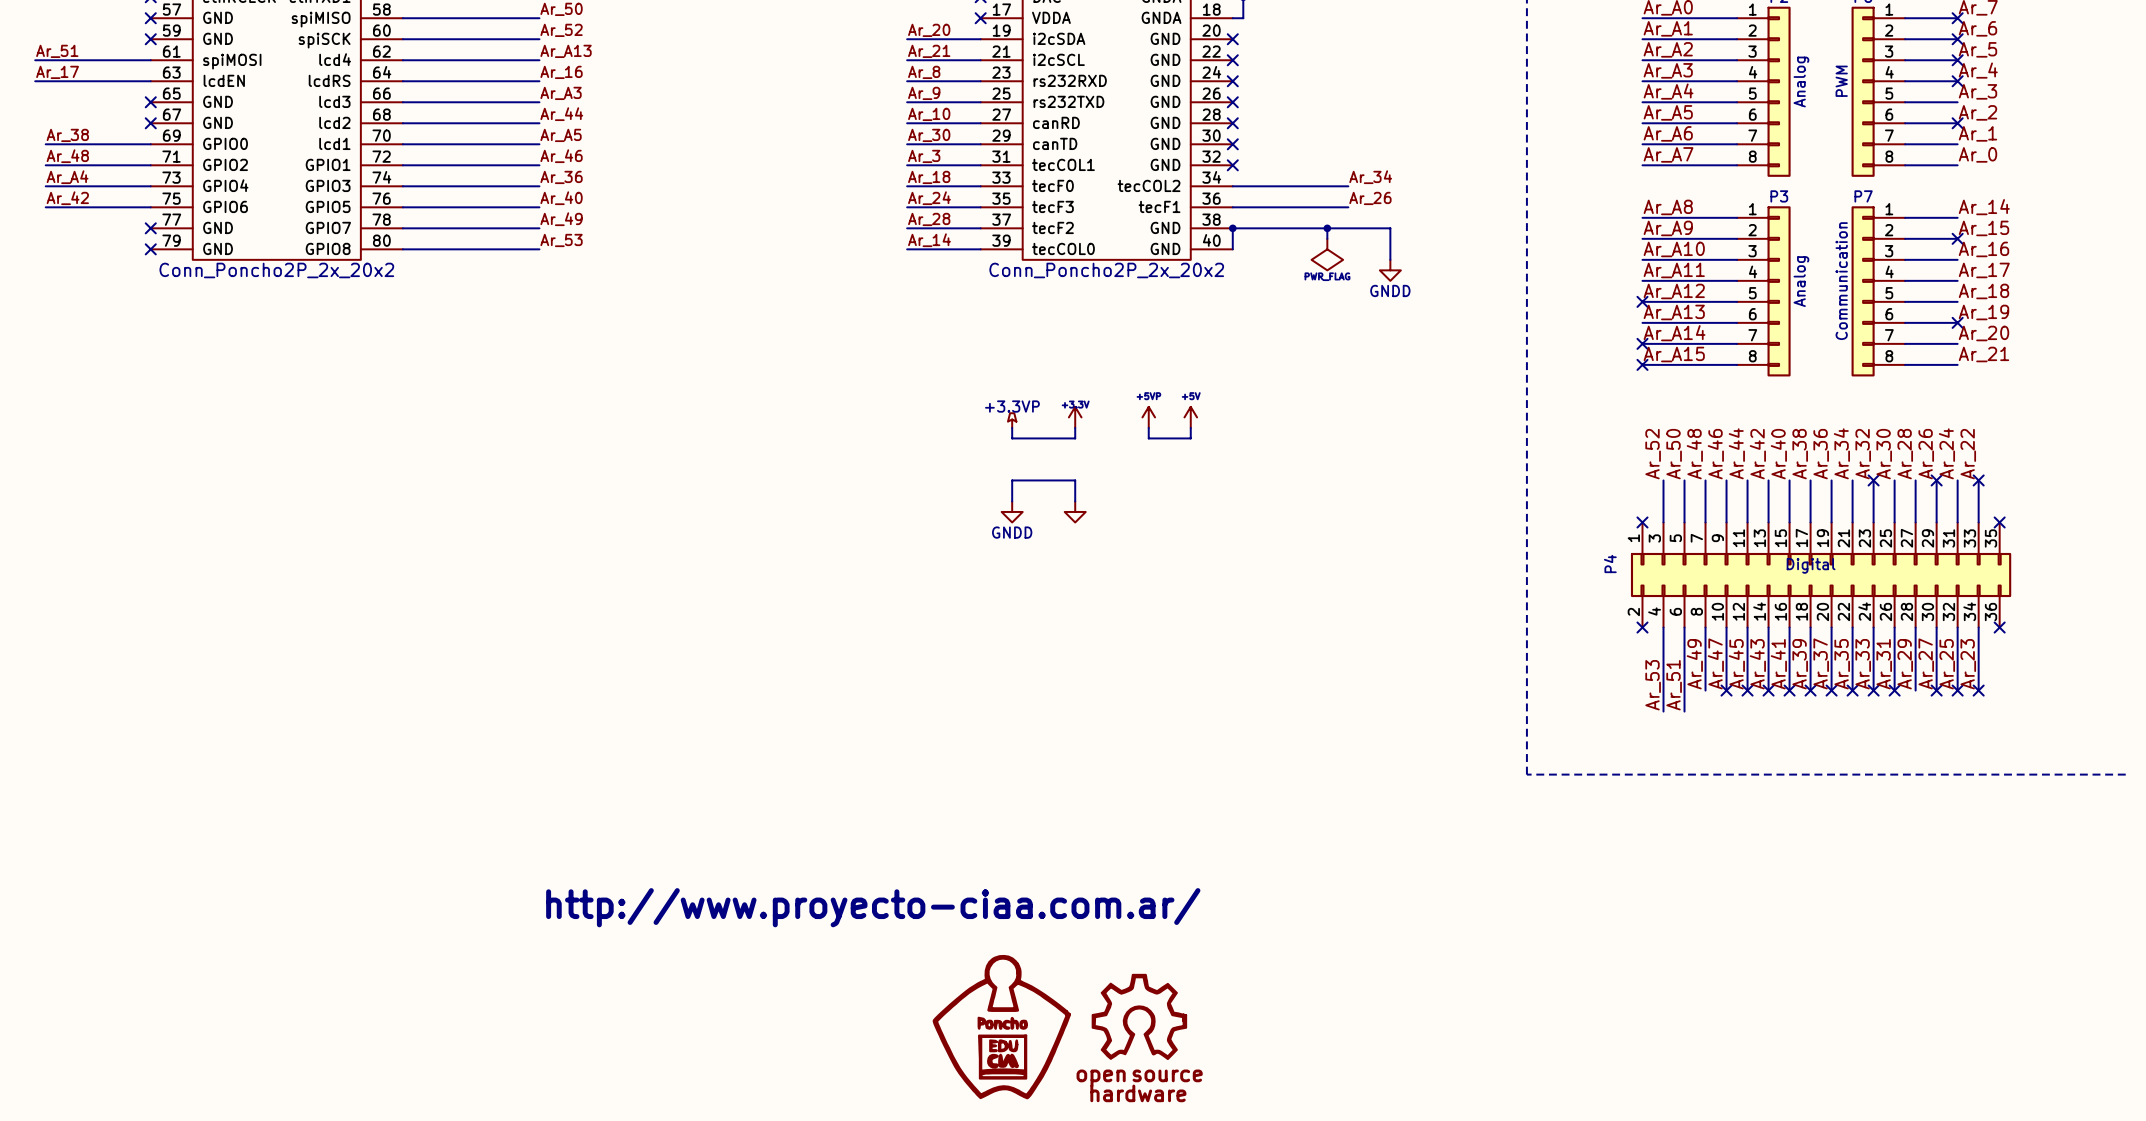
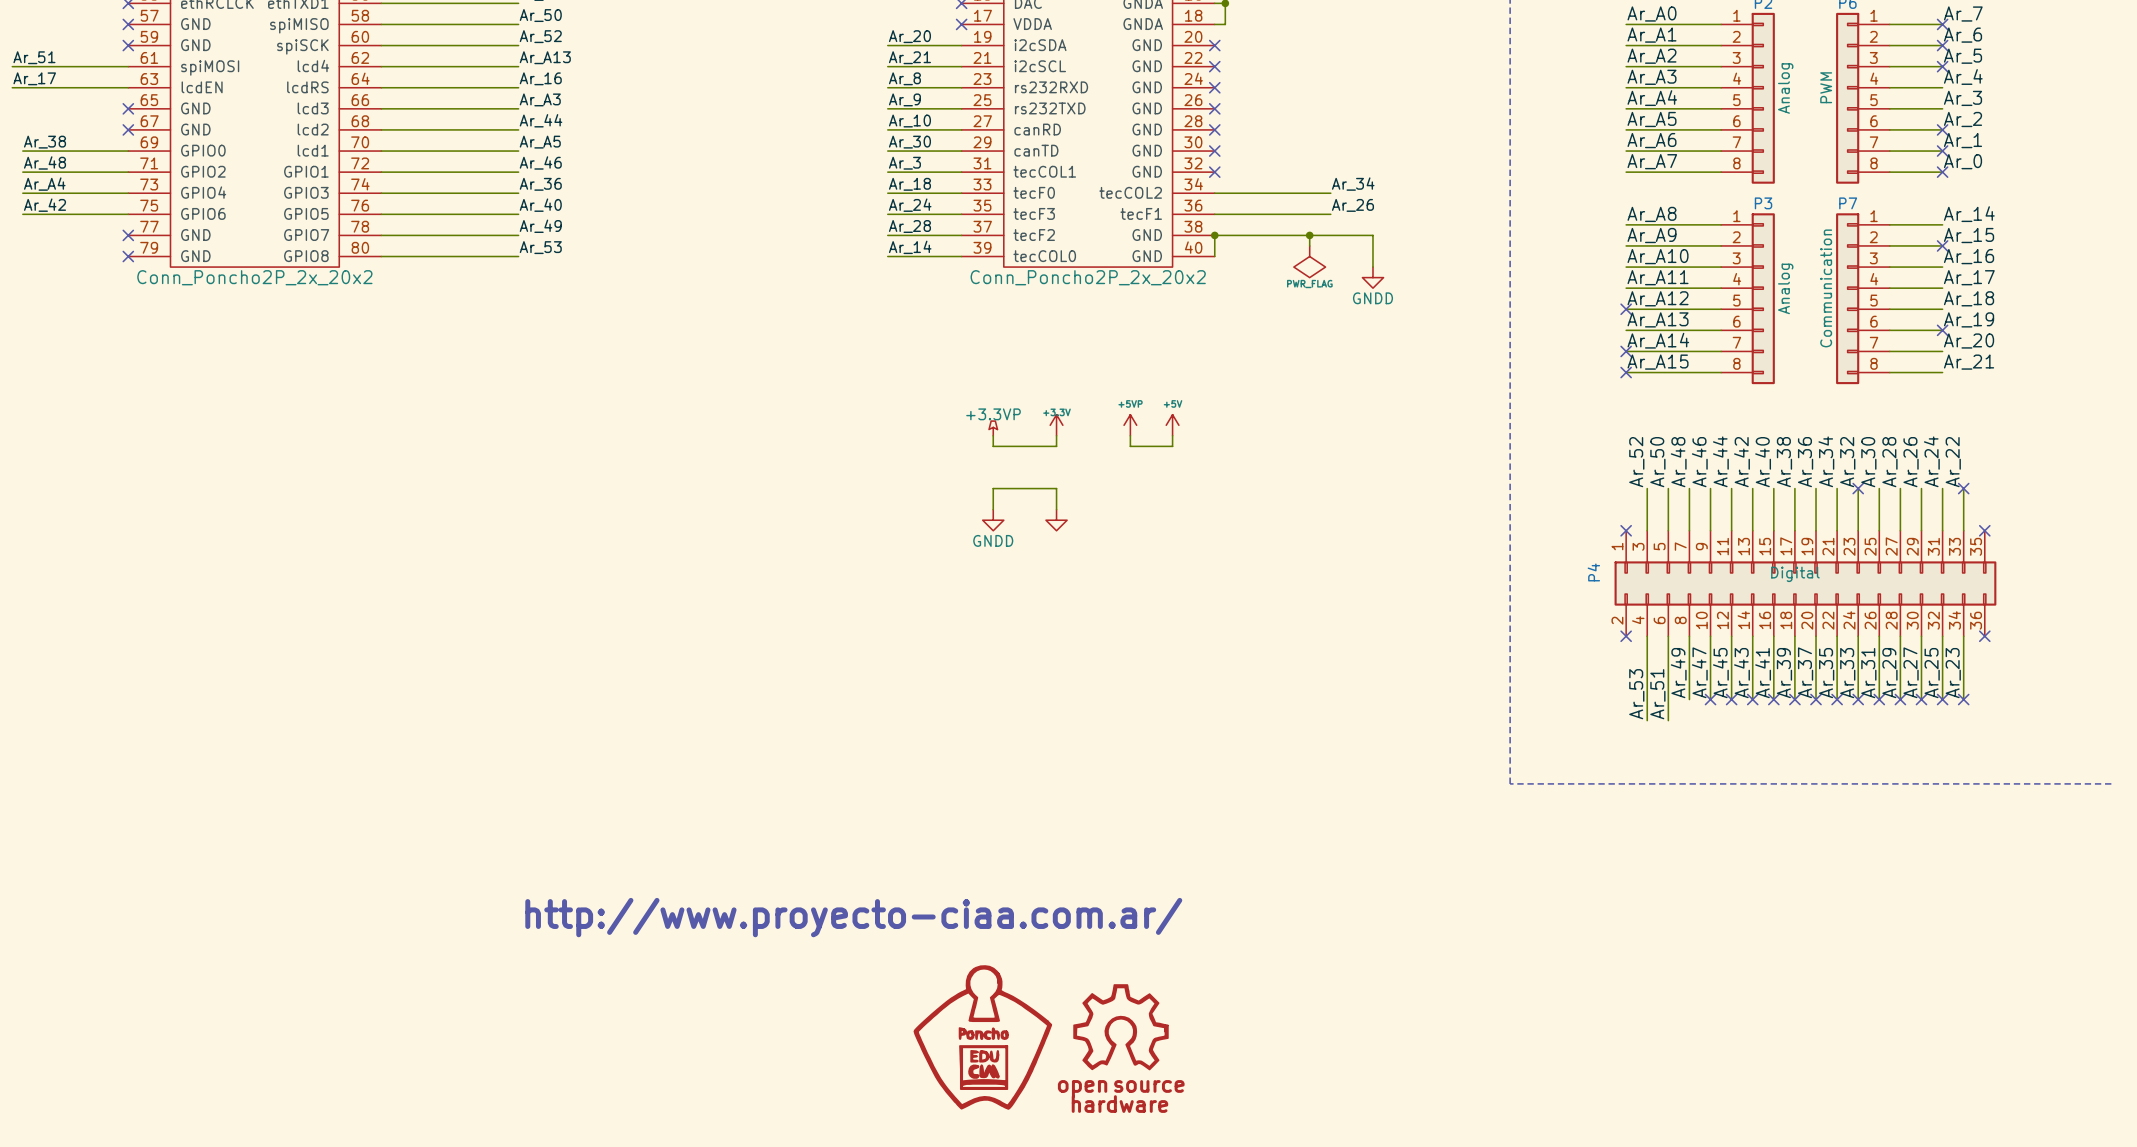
no-connect mark: (1957, 81) -> none
no-connect mark: none -> (1942, 151)
no-connect mark: none -> (1942, 172)
no-connect mark: (1936, 480) -> none
no-connect mark: none -> (1900, 699)

